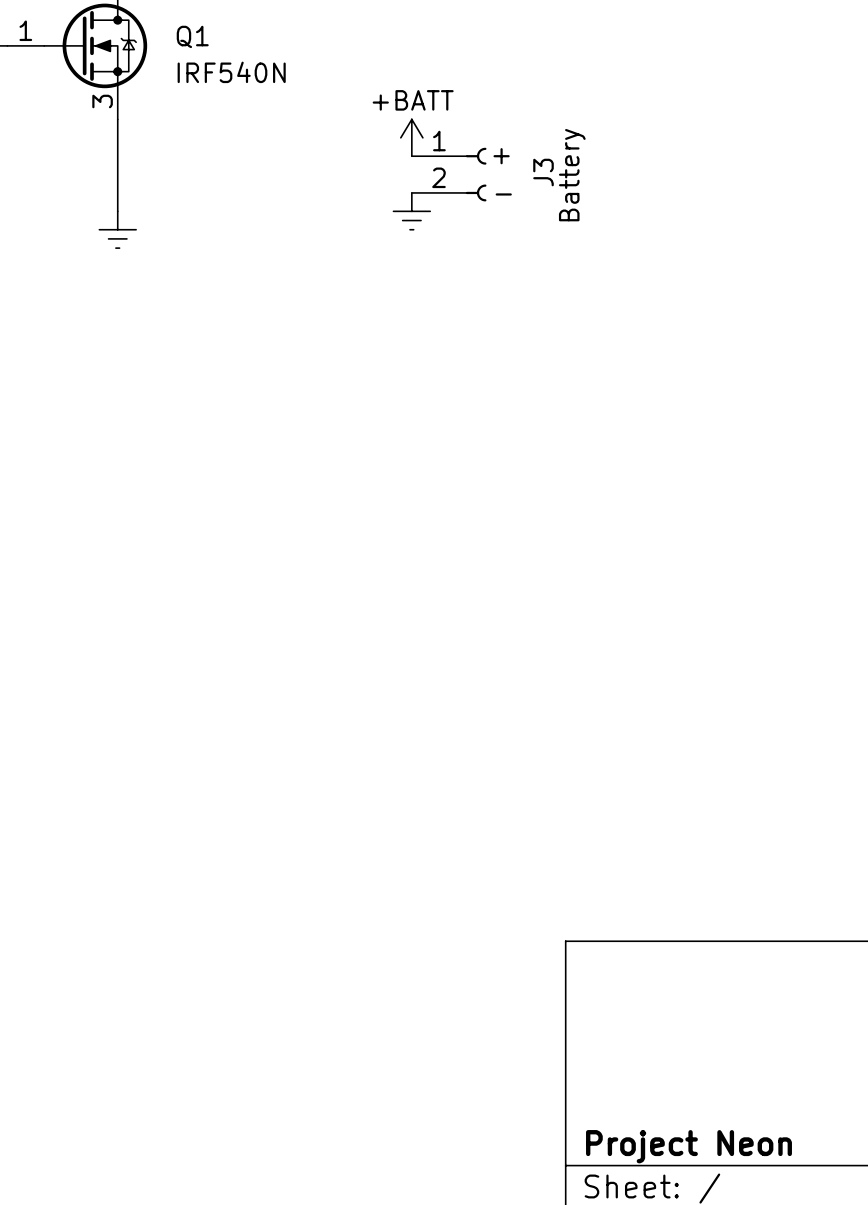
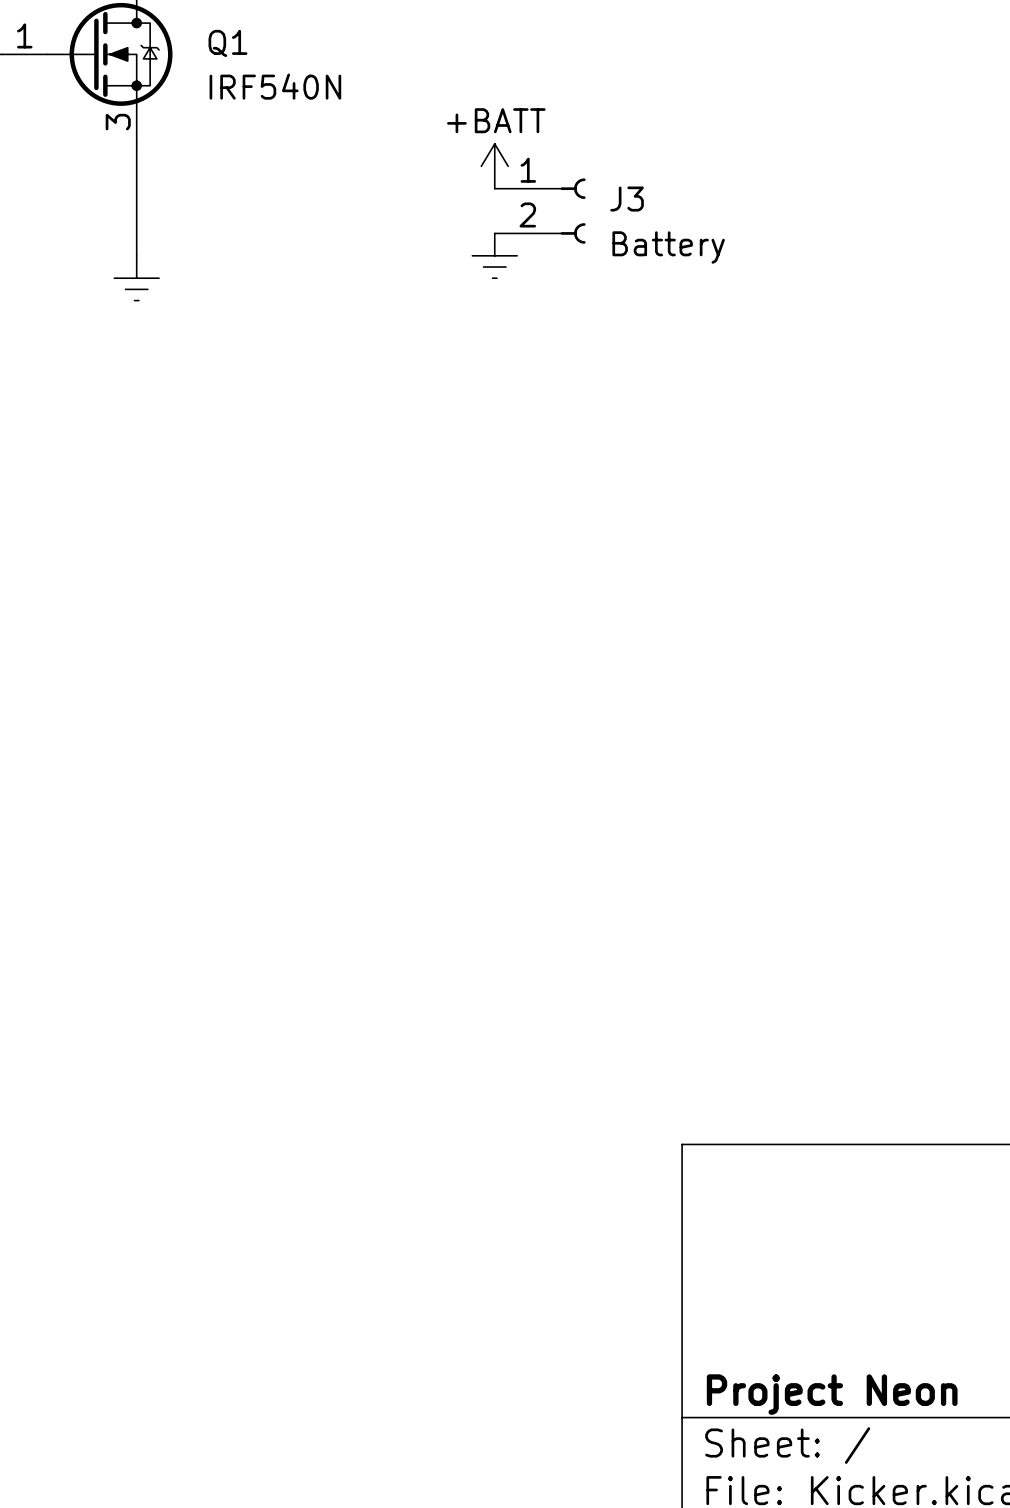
J3 text: + (501, 156) -> none
J3 name rotation: 0° (543, 172) -> 90° clockwise (627, 199)
J3 value rotation: 0° (572, 175) -> 90° clockwise (668, 247)
J3 text: - (503, 194) -> none

